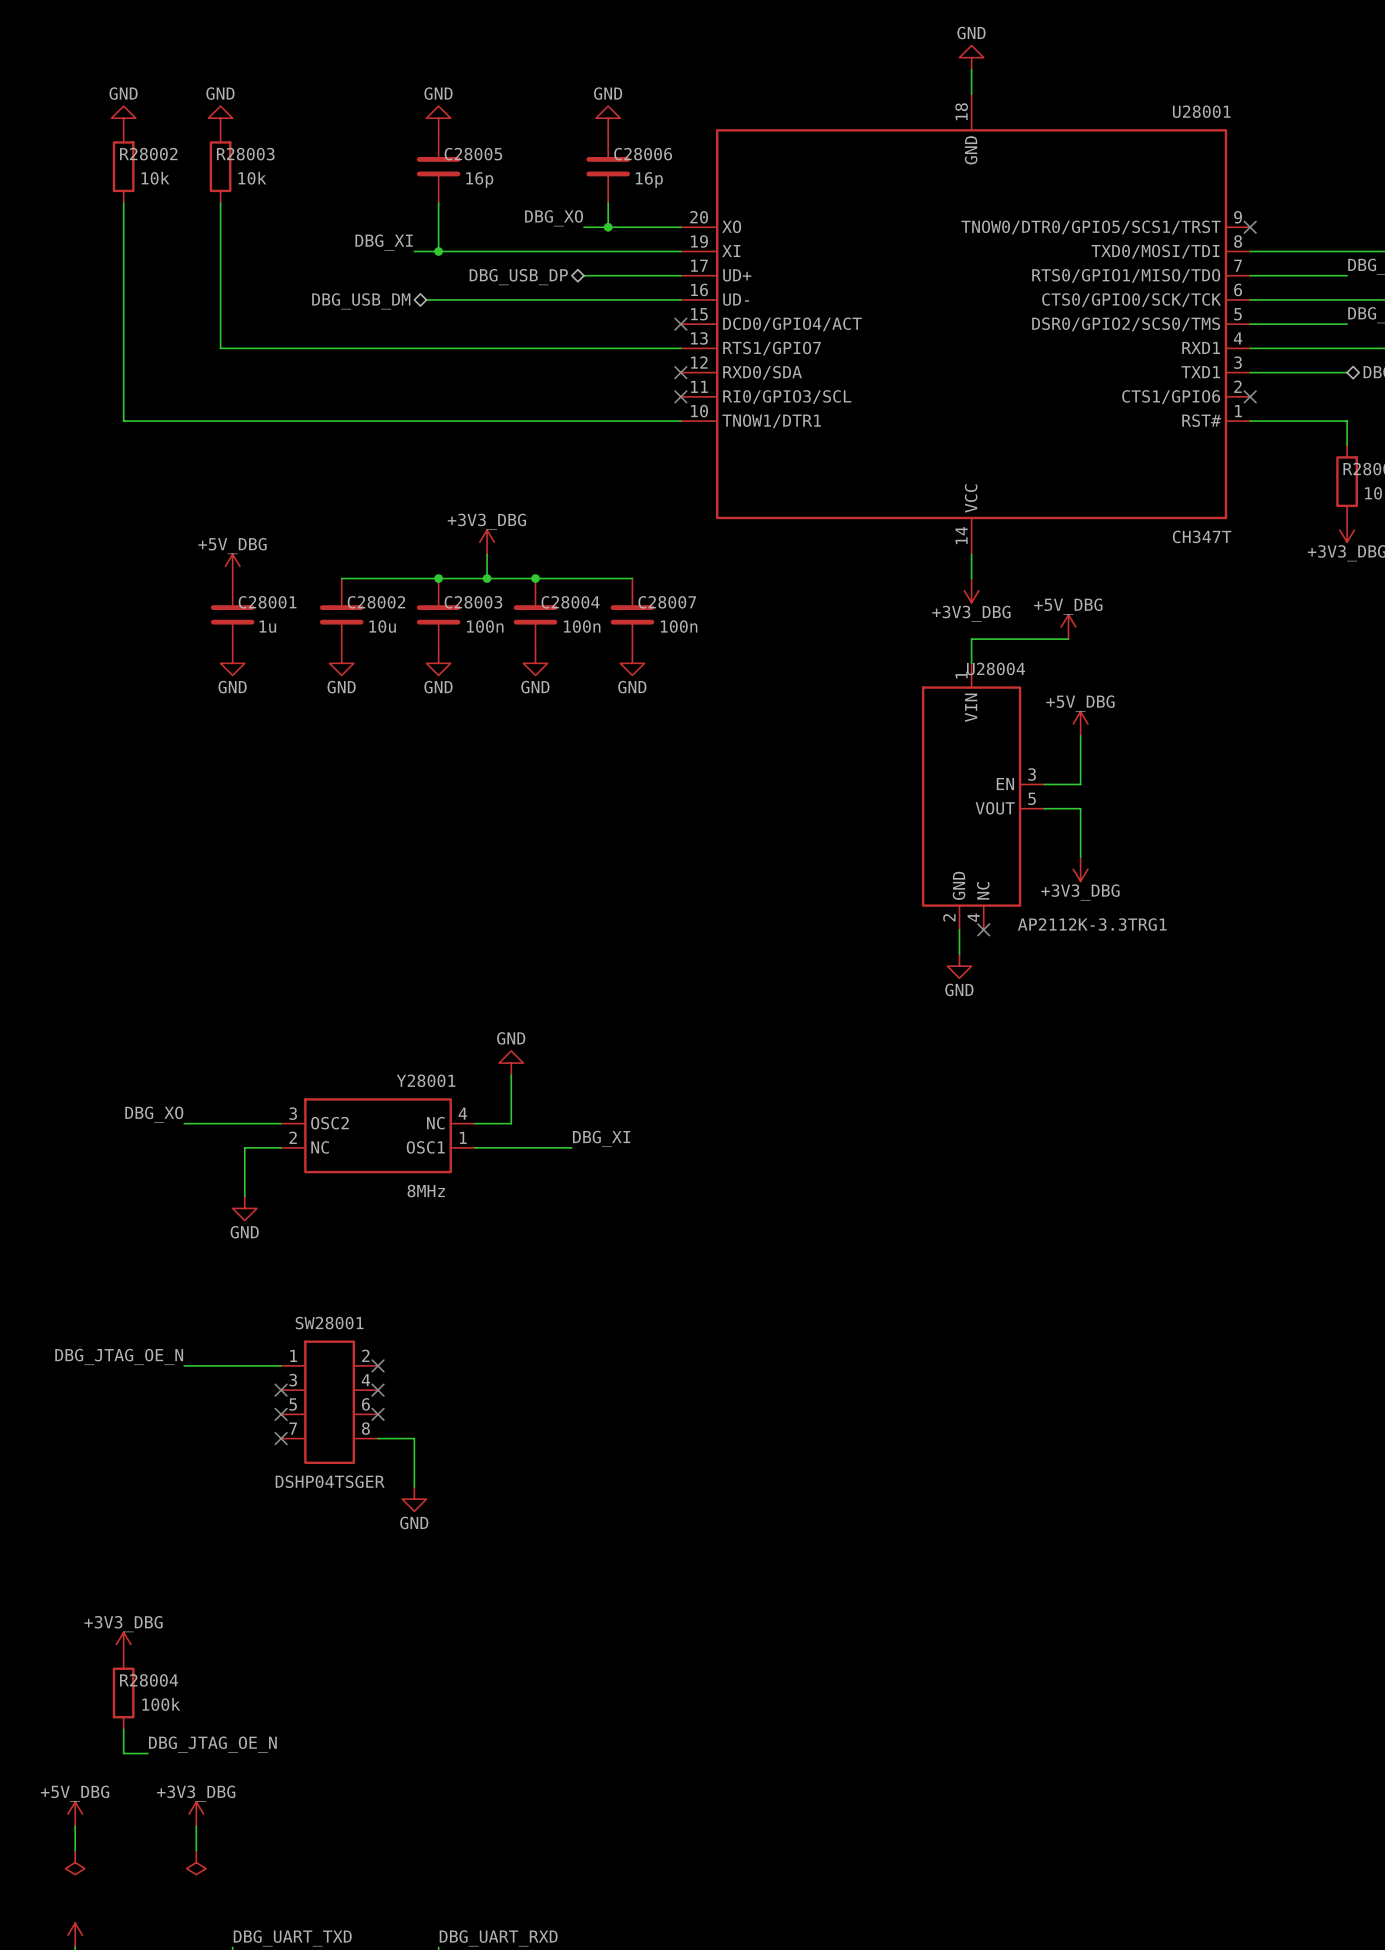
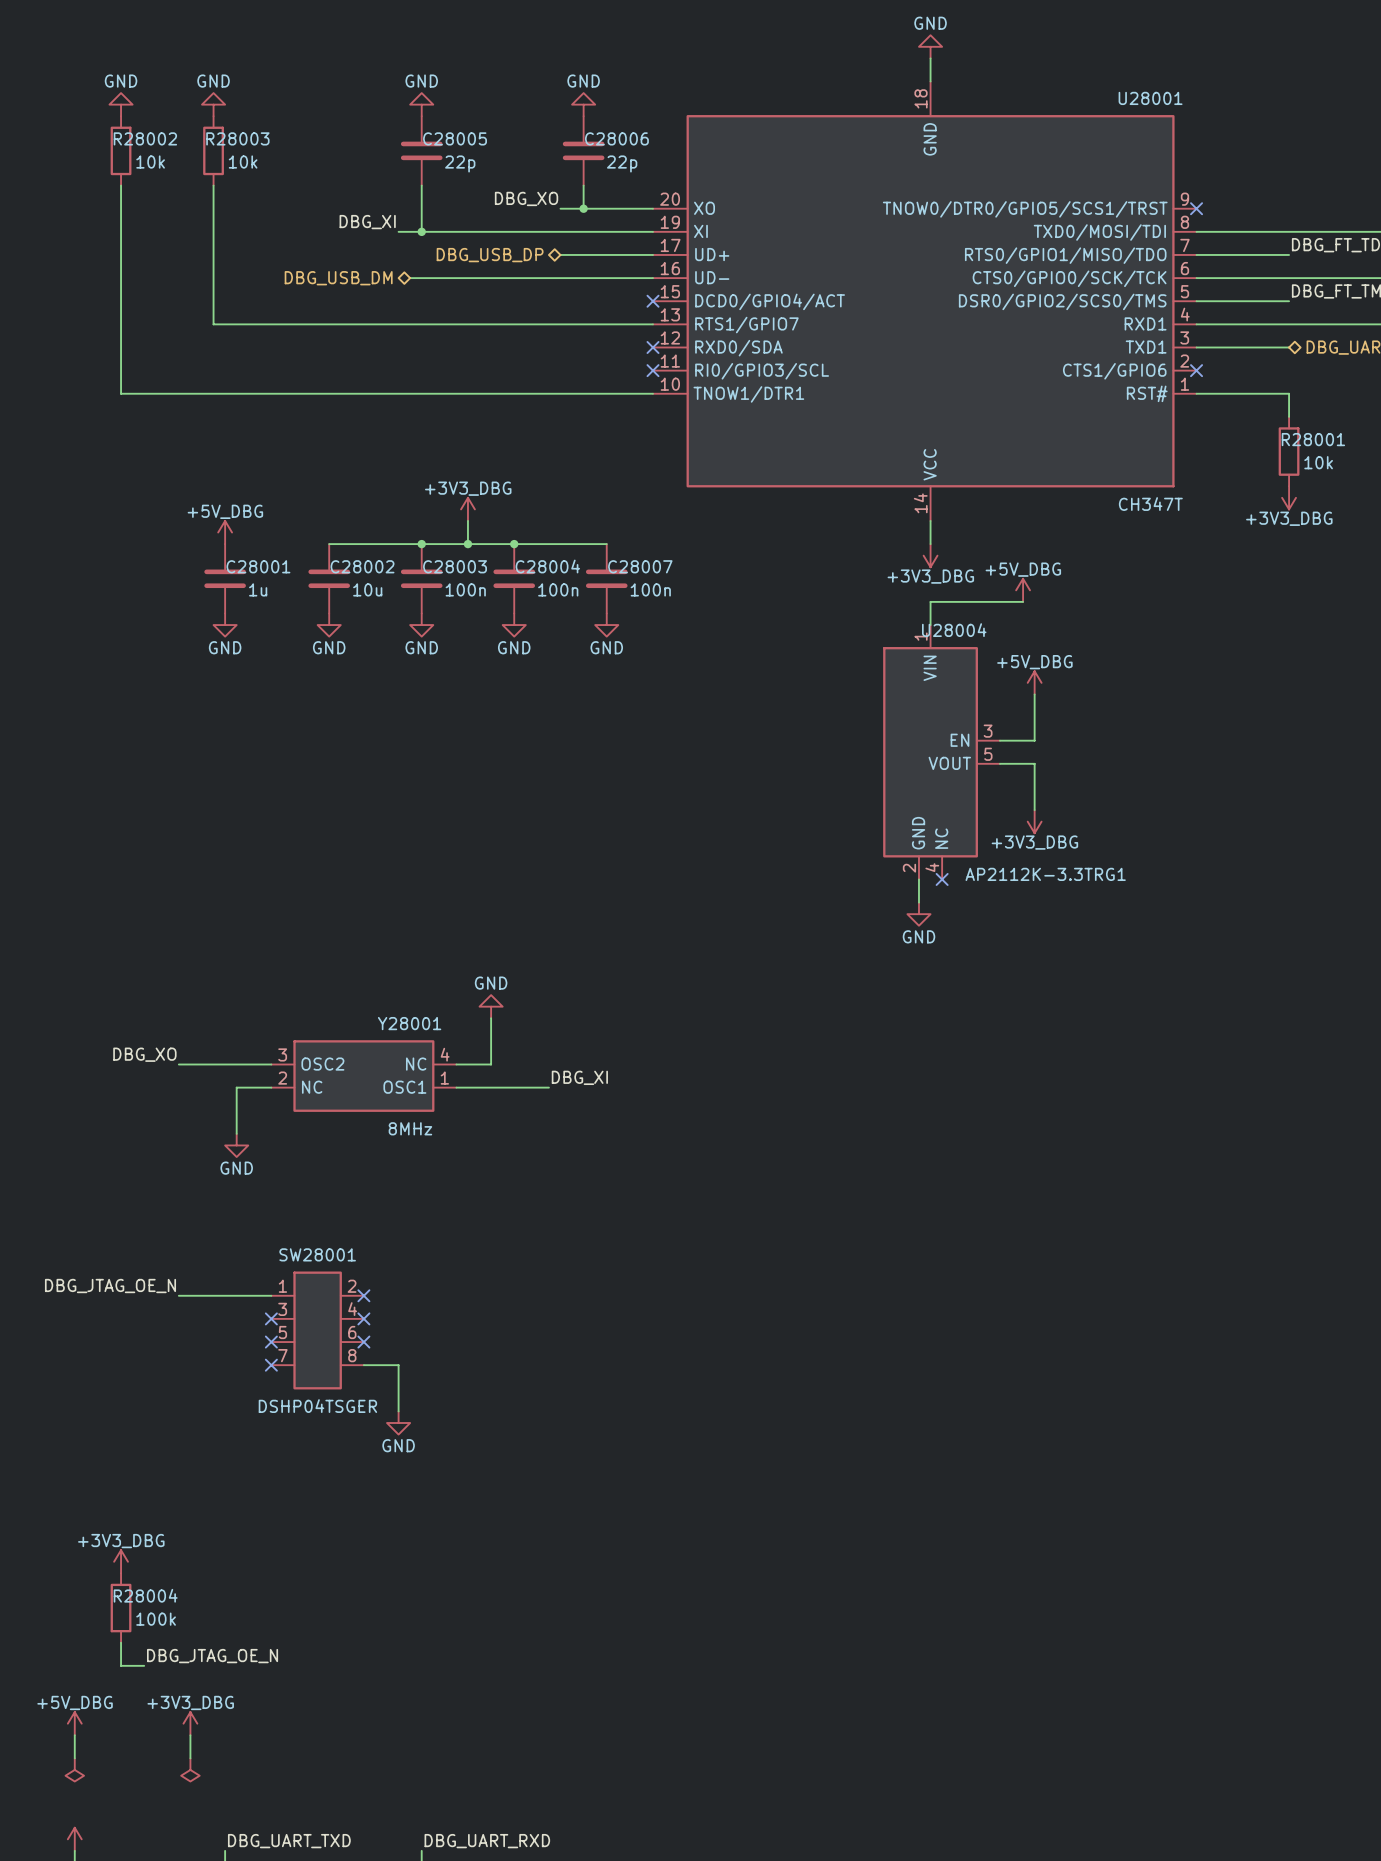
C28005 value: 16p (479, 179) -> 22p (460, 163)
C28006 value: 16p (649, 179) -> 22p (622, 163)

